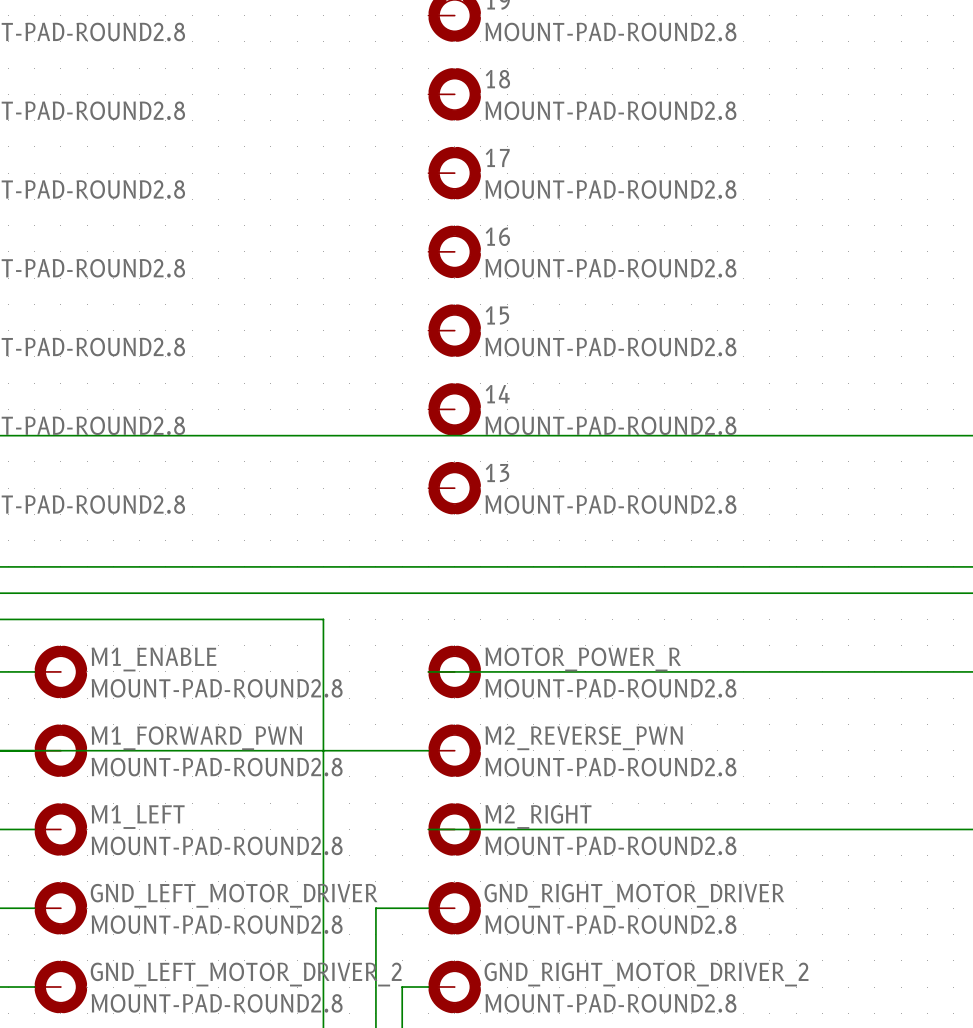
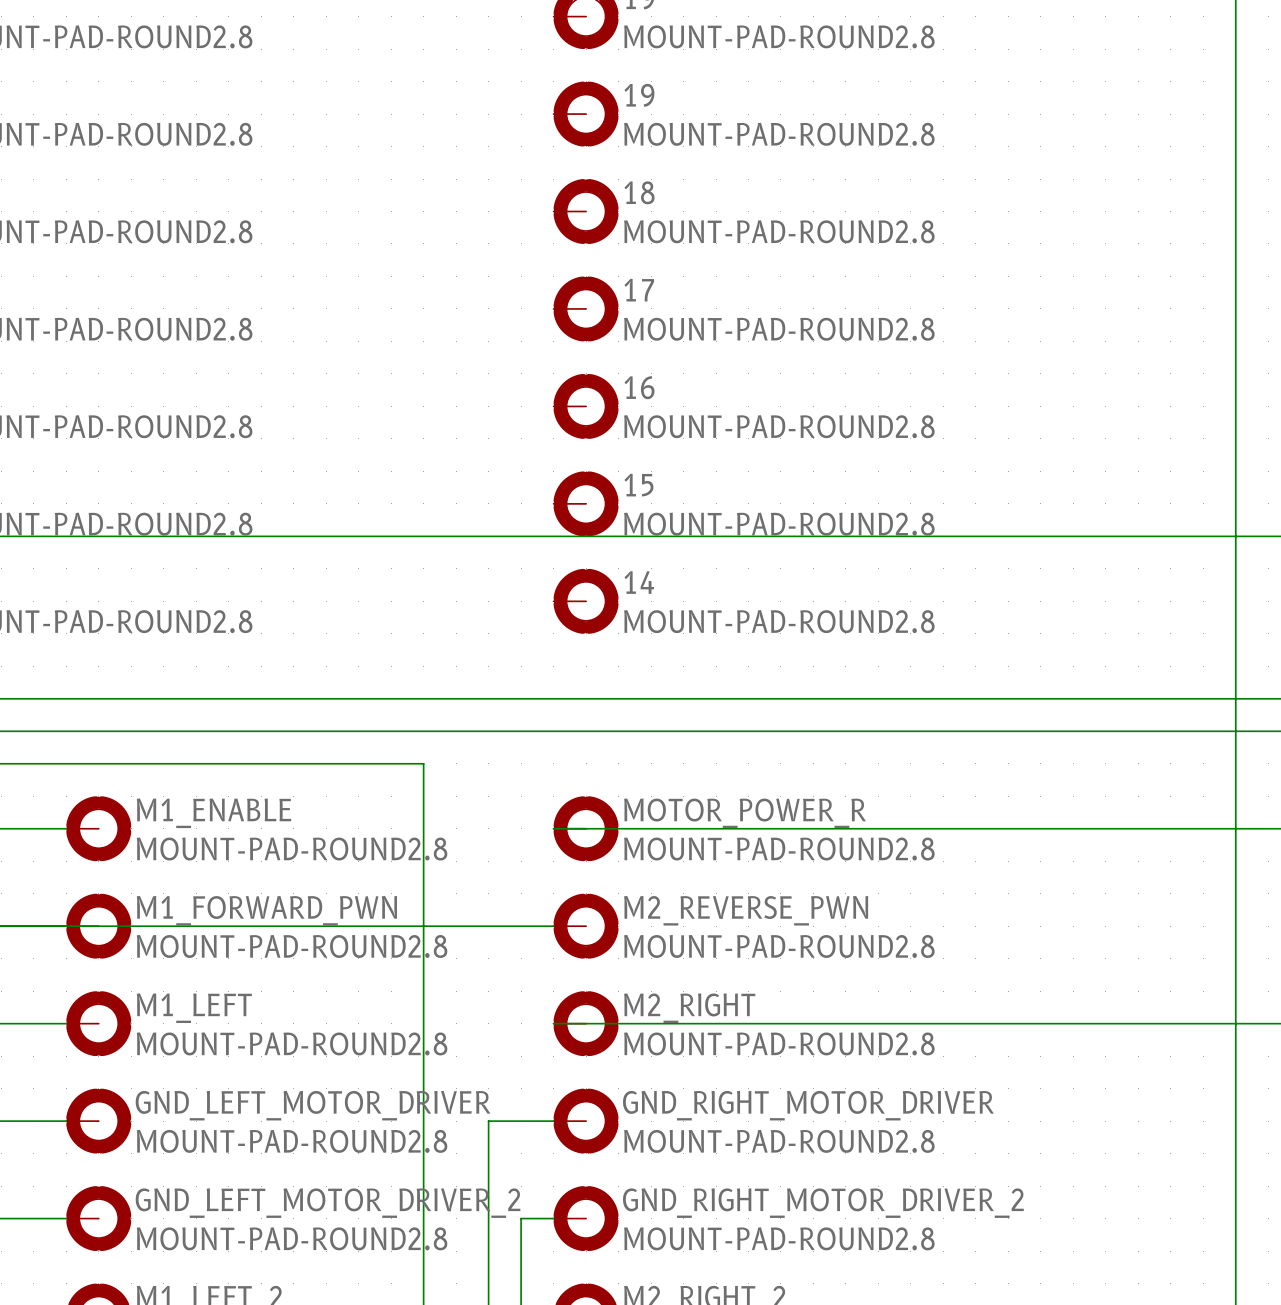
18 name: 18 (497, 79) -> 19 (639, 95)
17 name: 17 (497, 157) -> 18 (639, 192)
16 name: 16 (497, 236) -> 17 (639, 290)
15 name: 15 (497, 315) -> 16 (639, 387)
14 name: 14 (497, 394) -> 15 (638, 485)
13 name: 13 (497, 472) -> 14 (639, 582)

